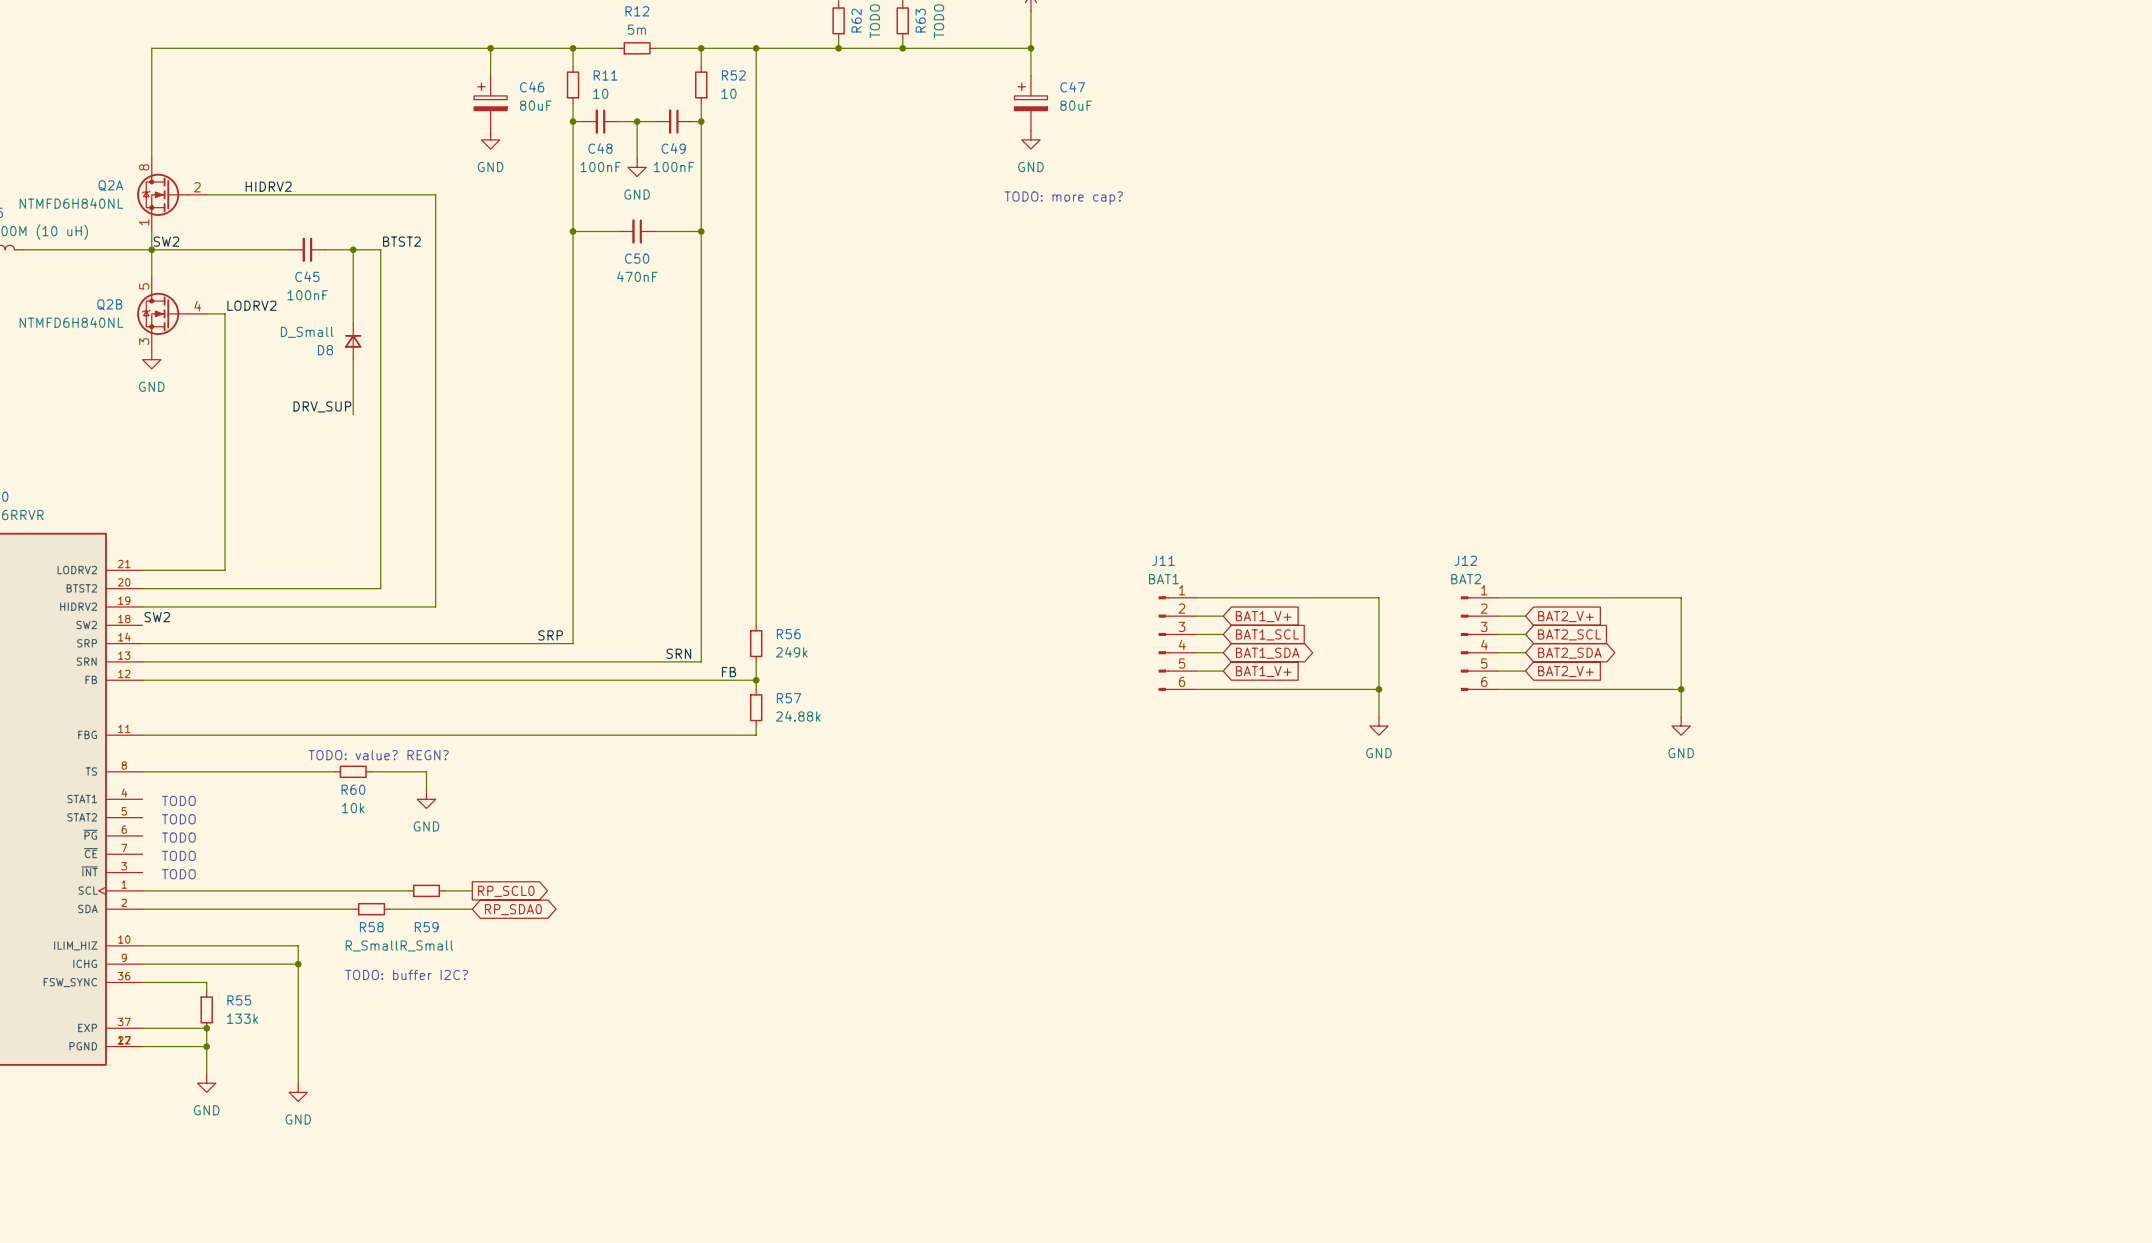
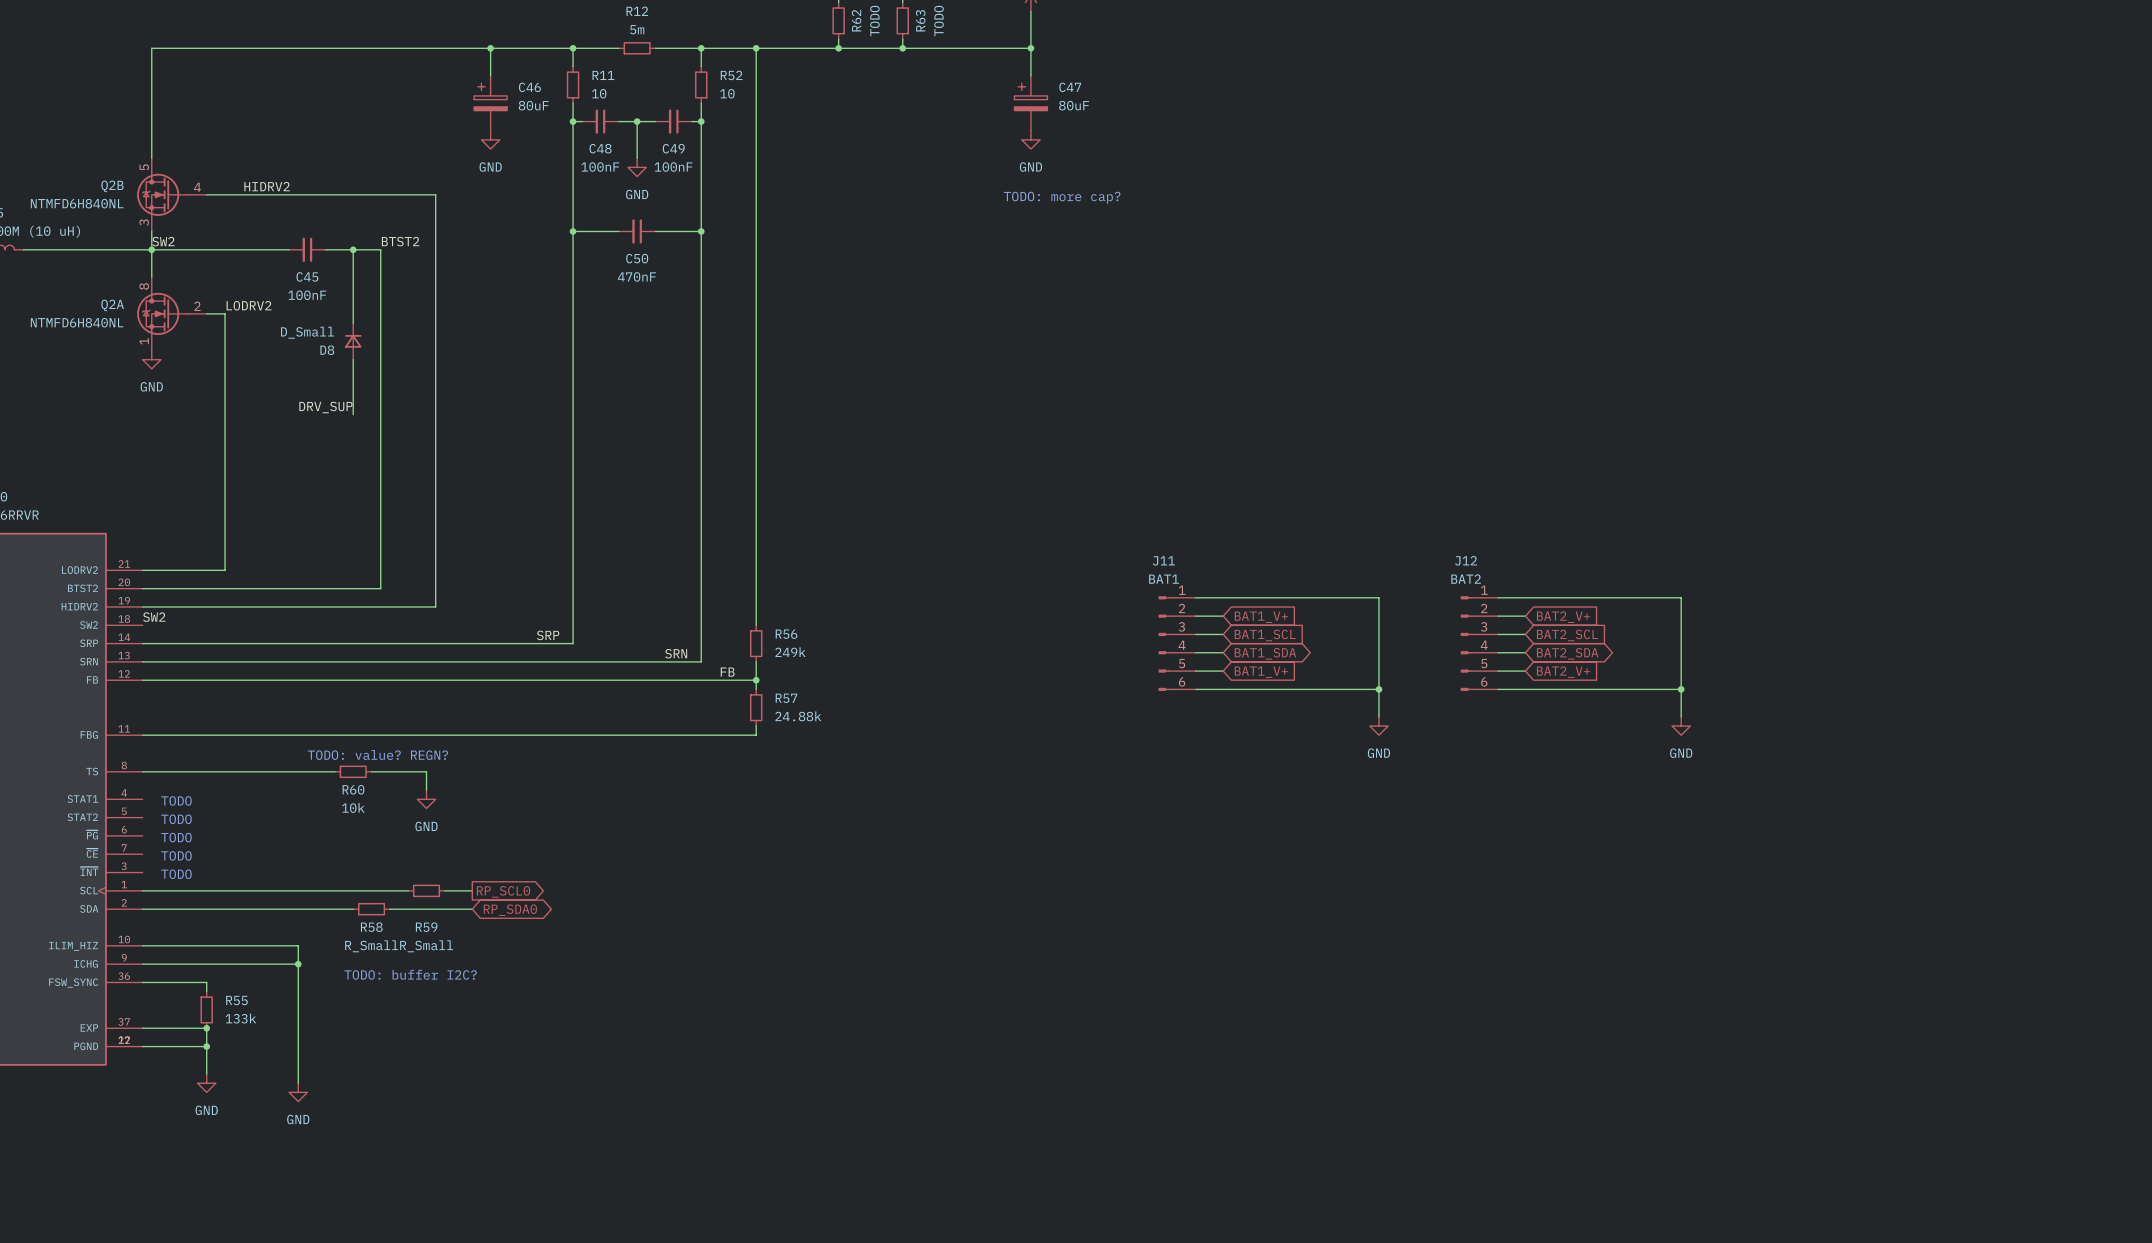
Q2A position: (171, 194) -> (171, 313)
Q2B position: (171, 313) -> (171, 194)

